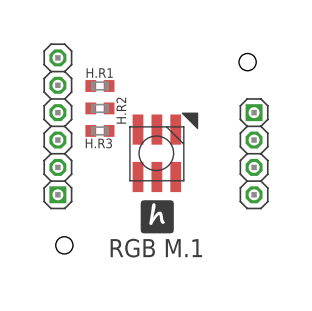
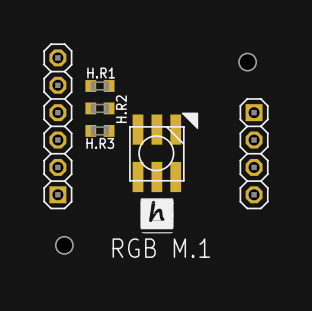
drawing: none -> [140, 198, 174, 230]
drawing: [140, 201, 174, 233] -> none

